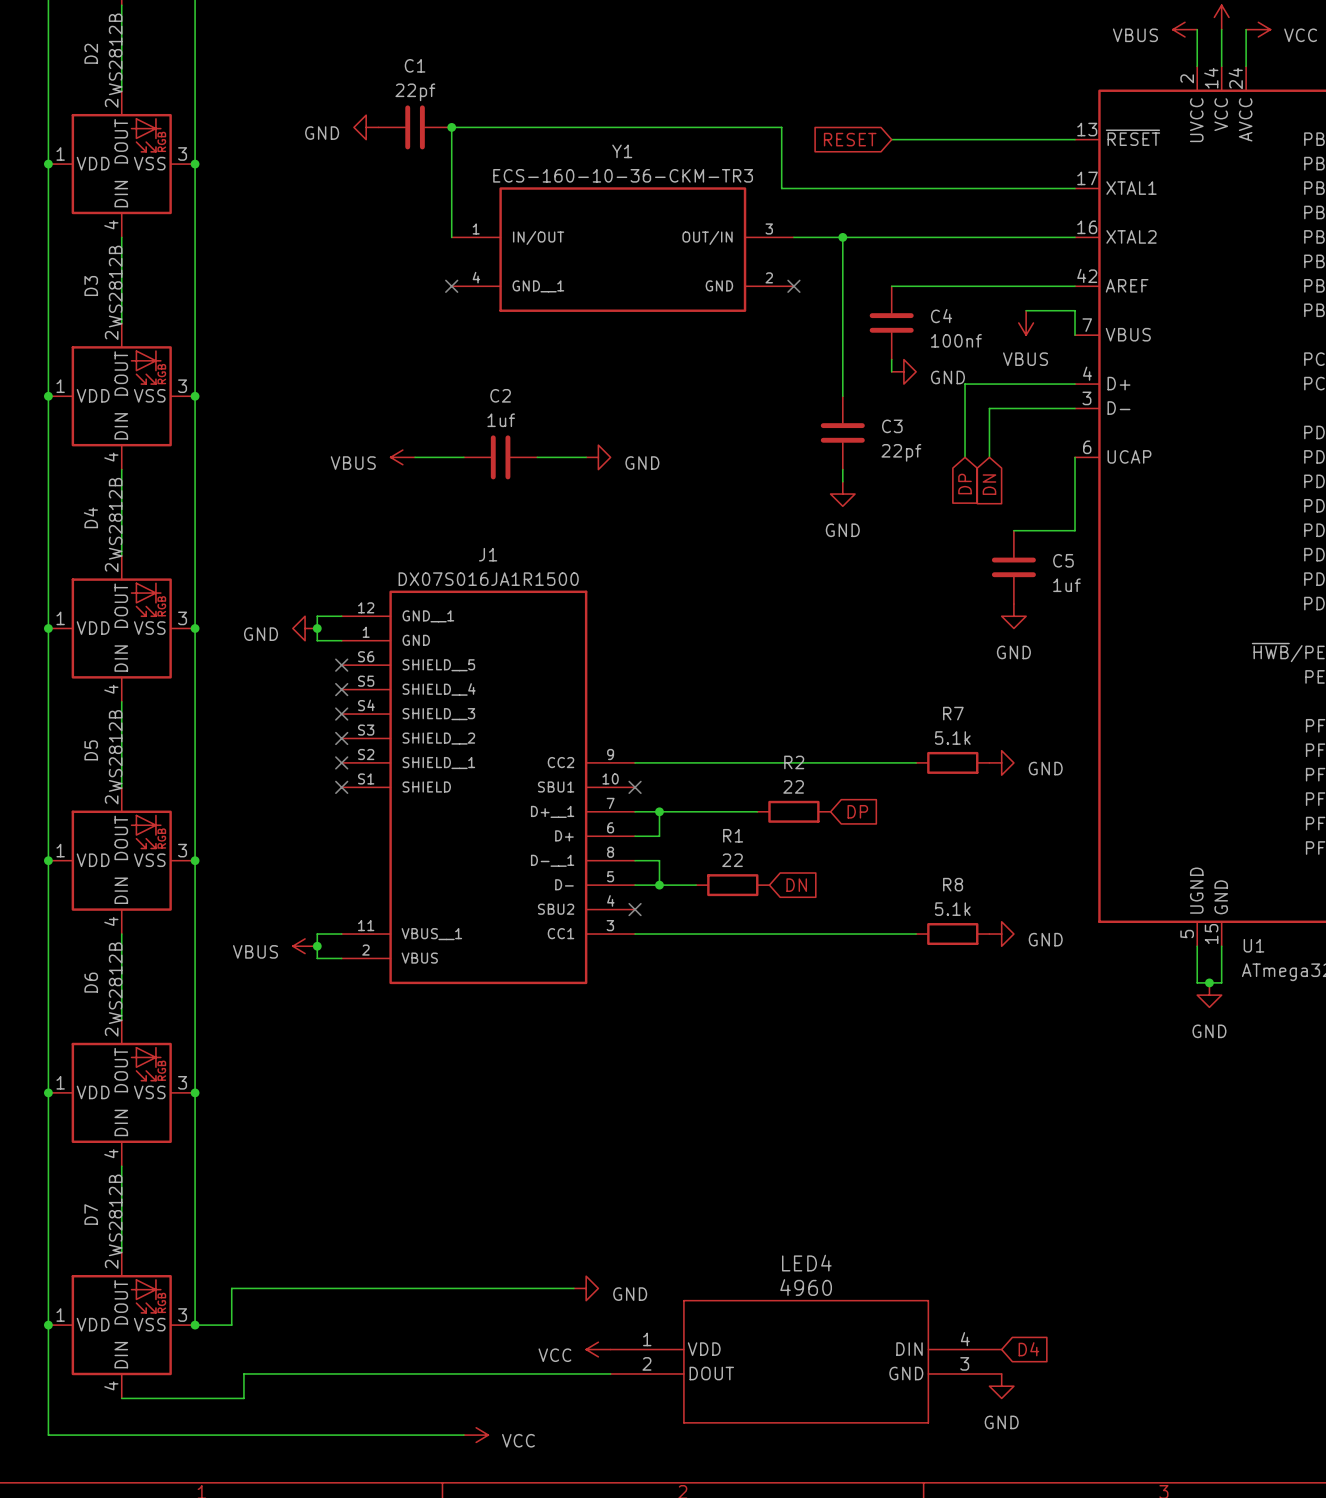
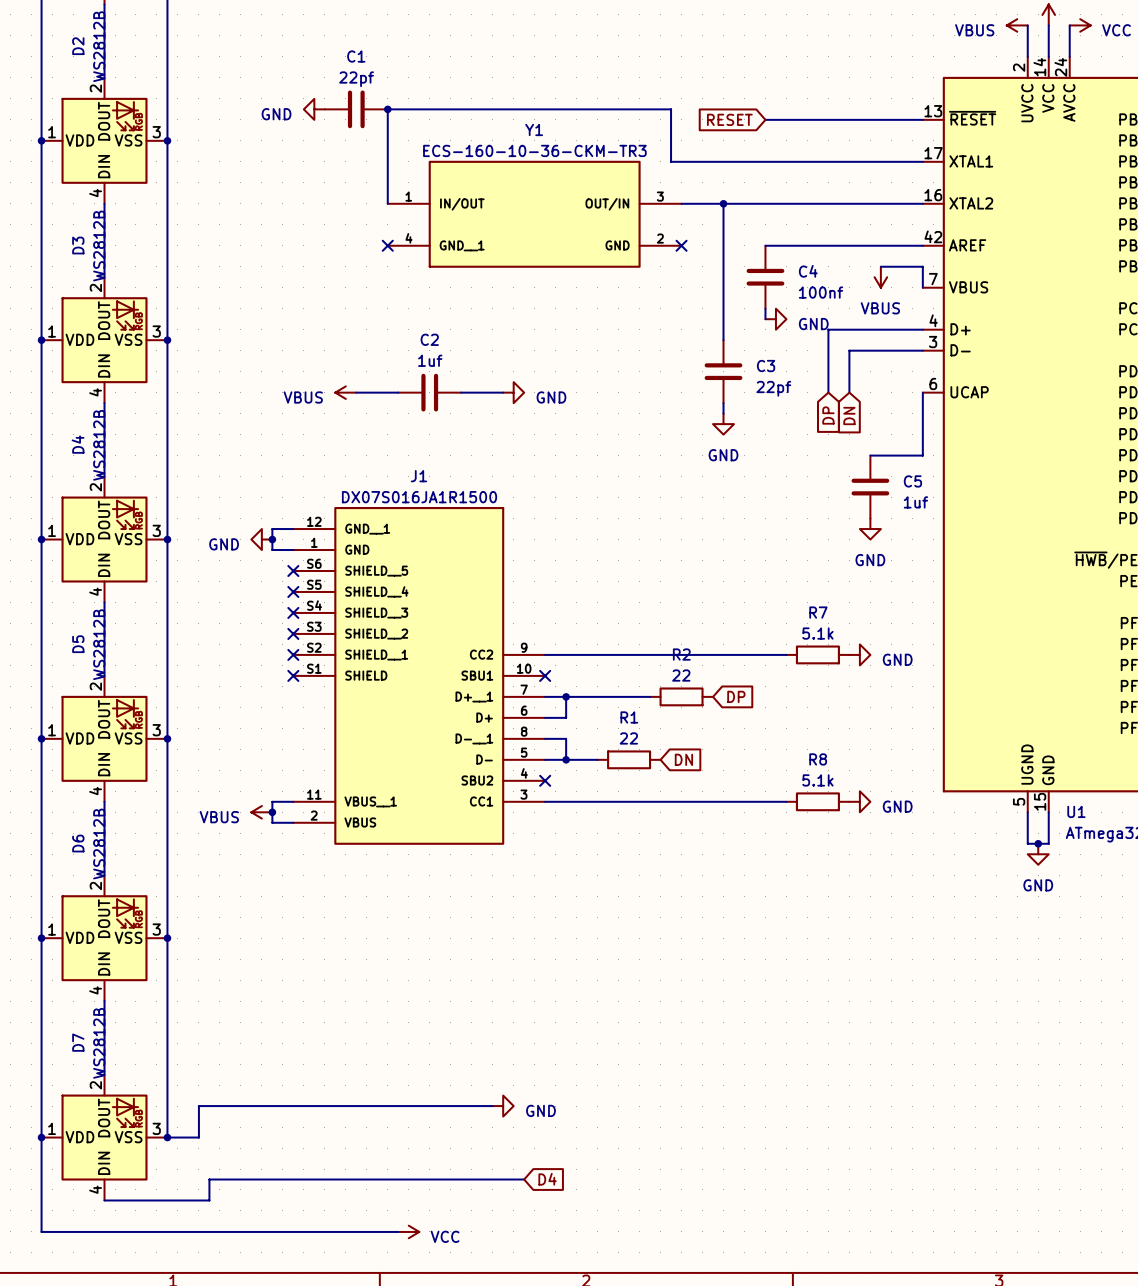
power symbol: VCC (598, 1349) -> none
global label: D4 (1028, 1349) -> none
LED4: 4960 (806, 1361) -> none
global label: none -> D4 (547, 1179)
power symbol: GND (1001, 1386) -> none

